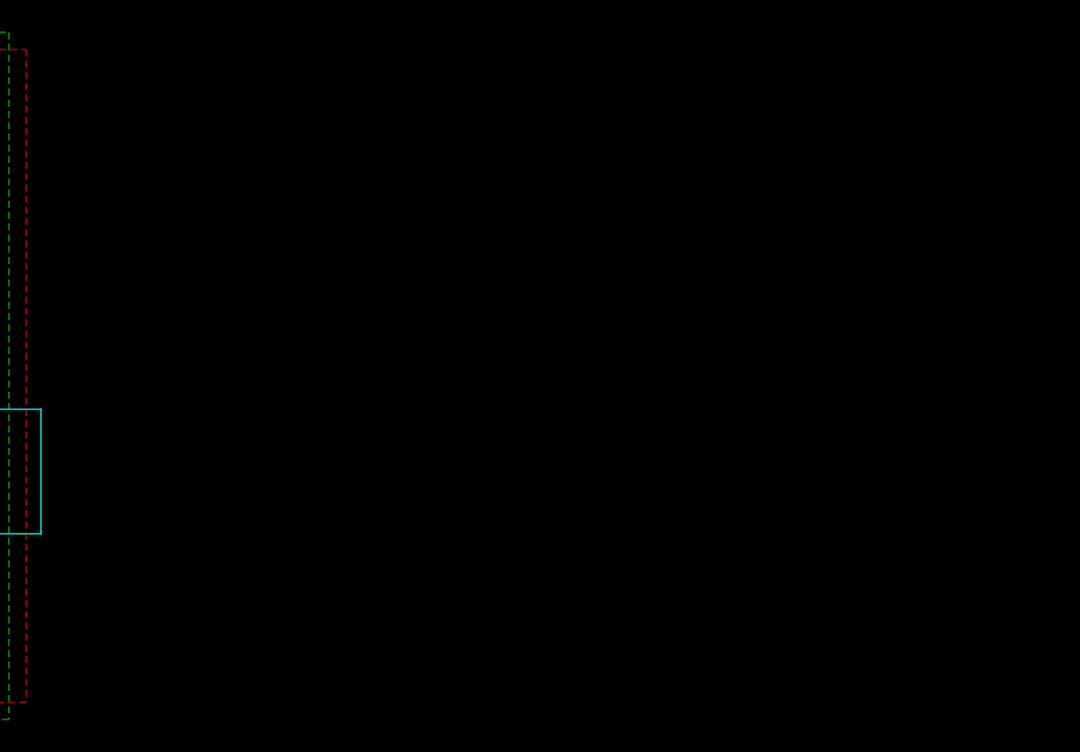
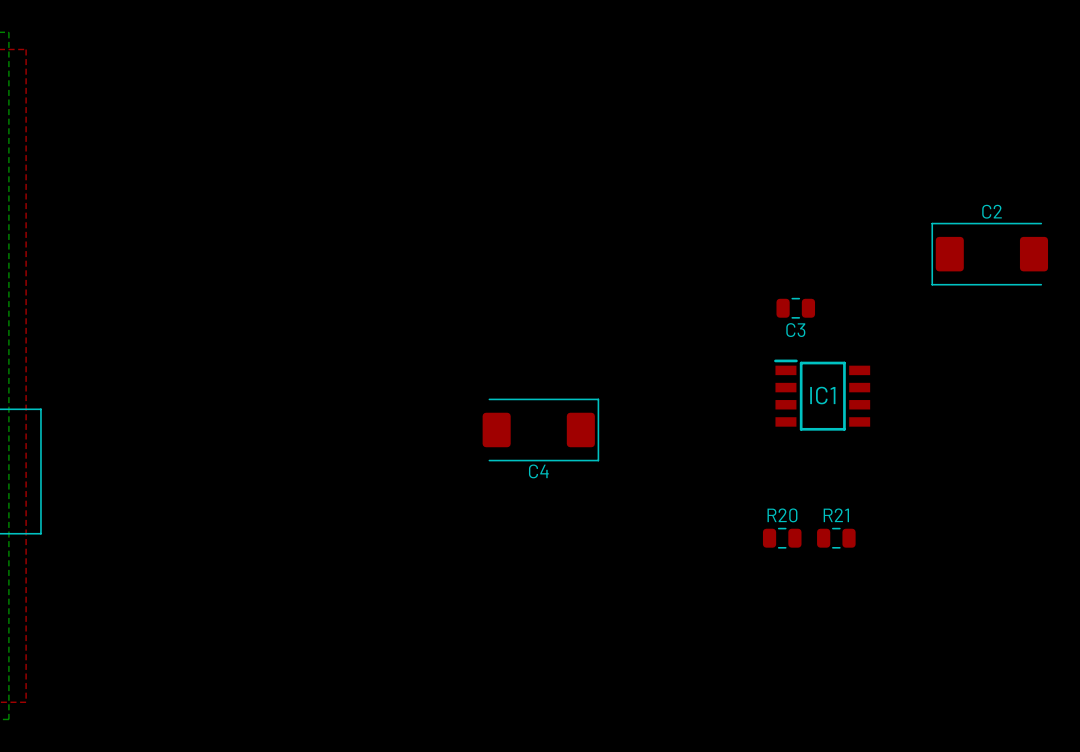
C2: none -> (989, 254)
C3: none -> (795, 308)
IC1: none -> (822, 395)
C4: none -> (540, 429)
R20: none -> (782, 538)
R21: none -> (836, 538)

